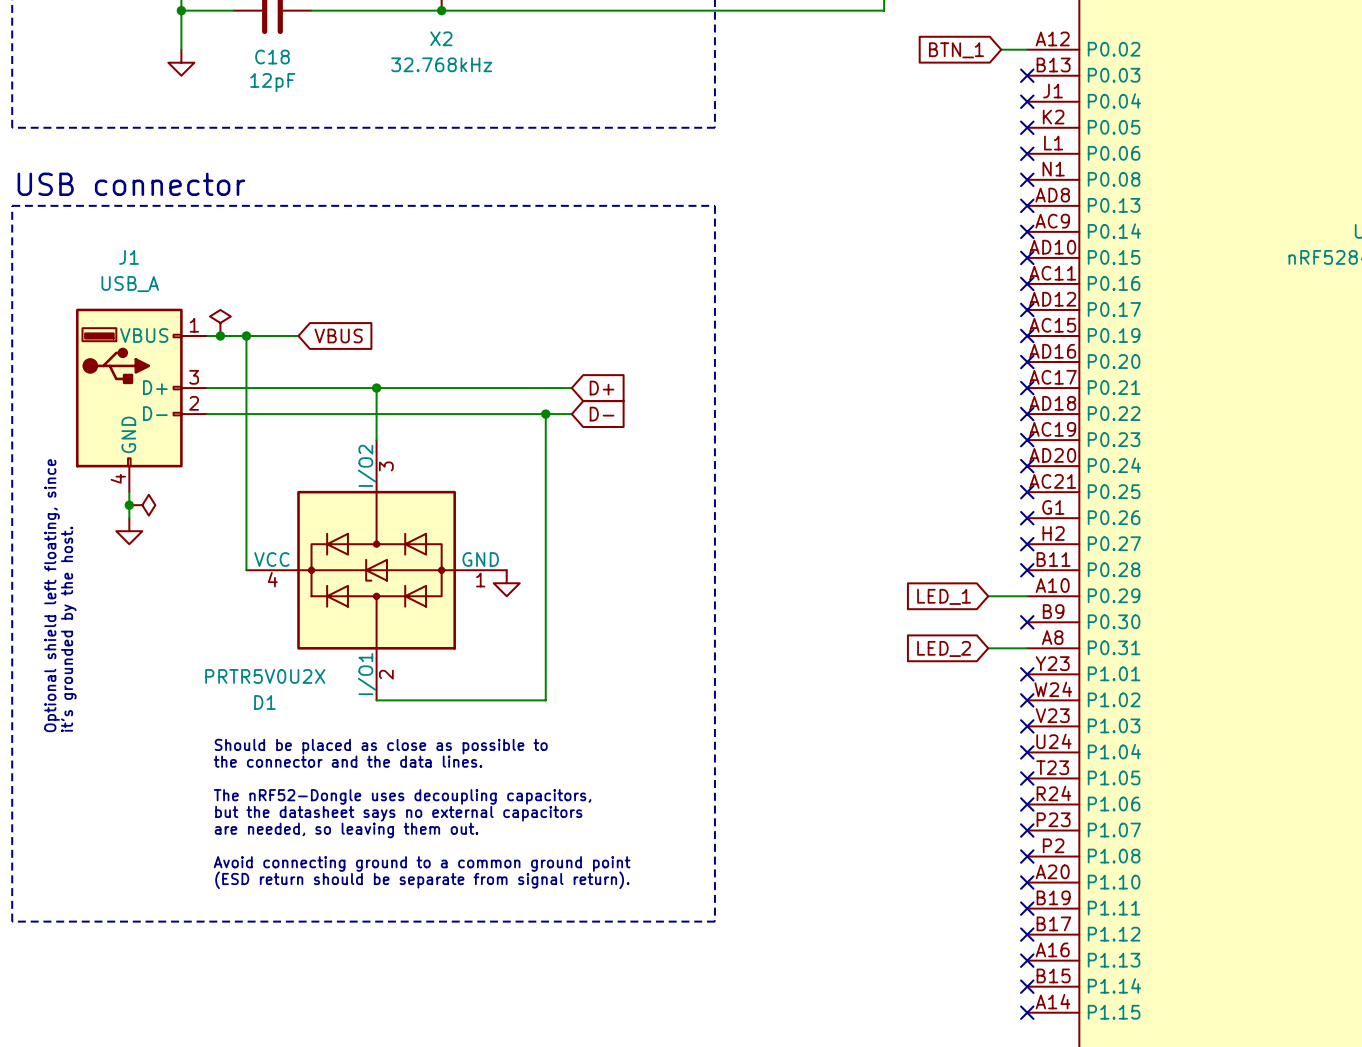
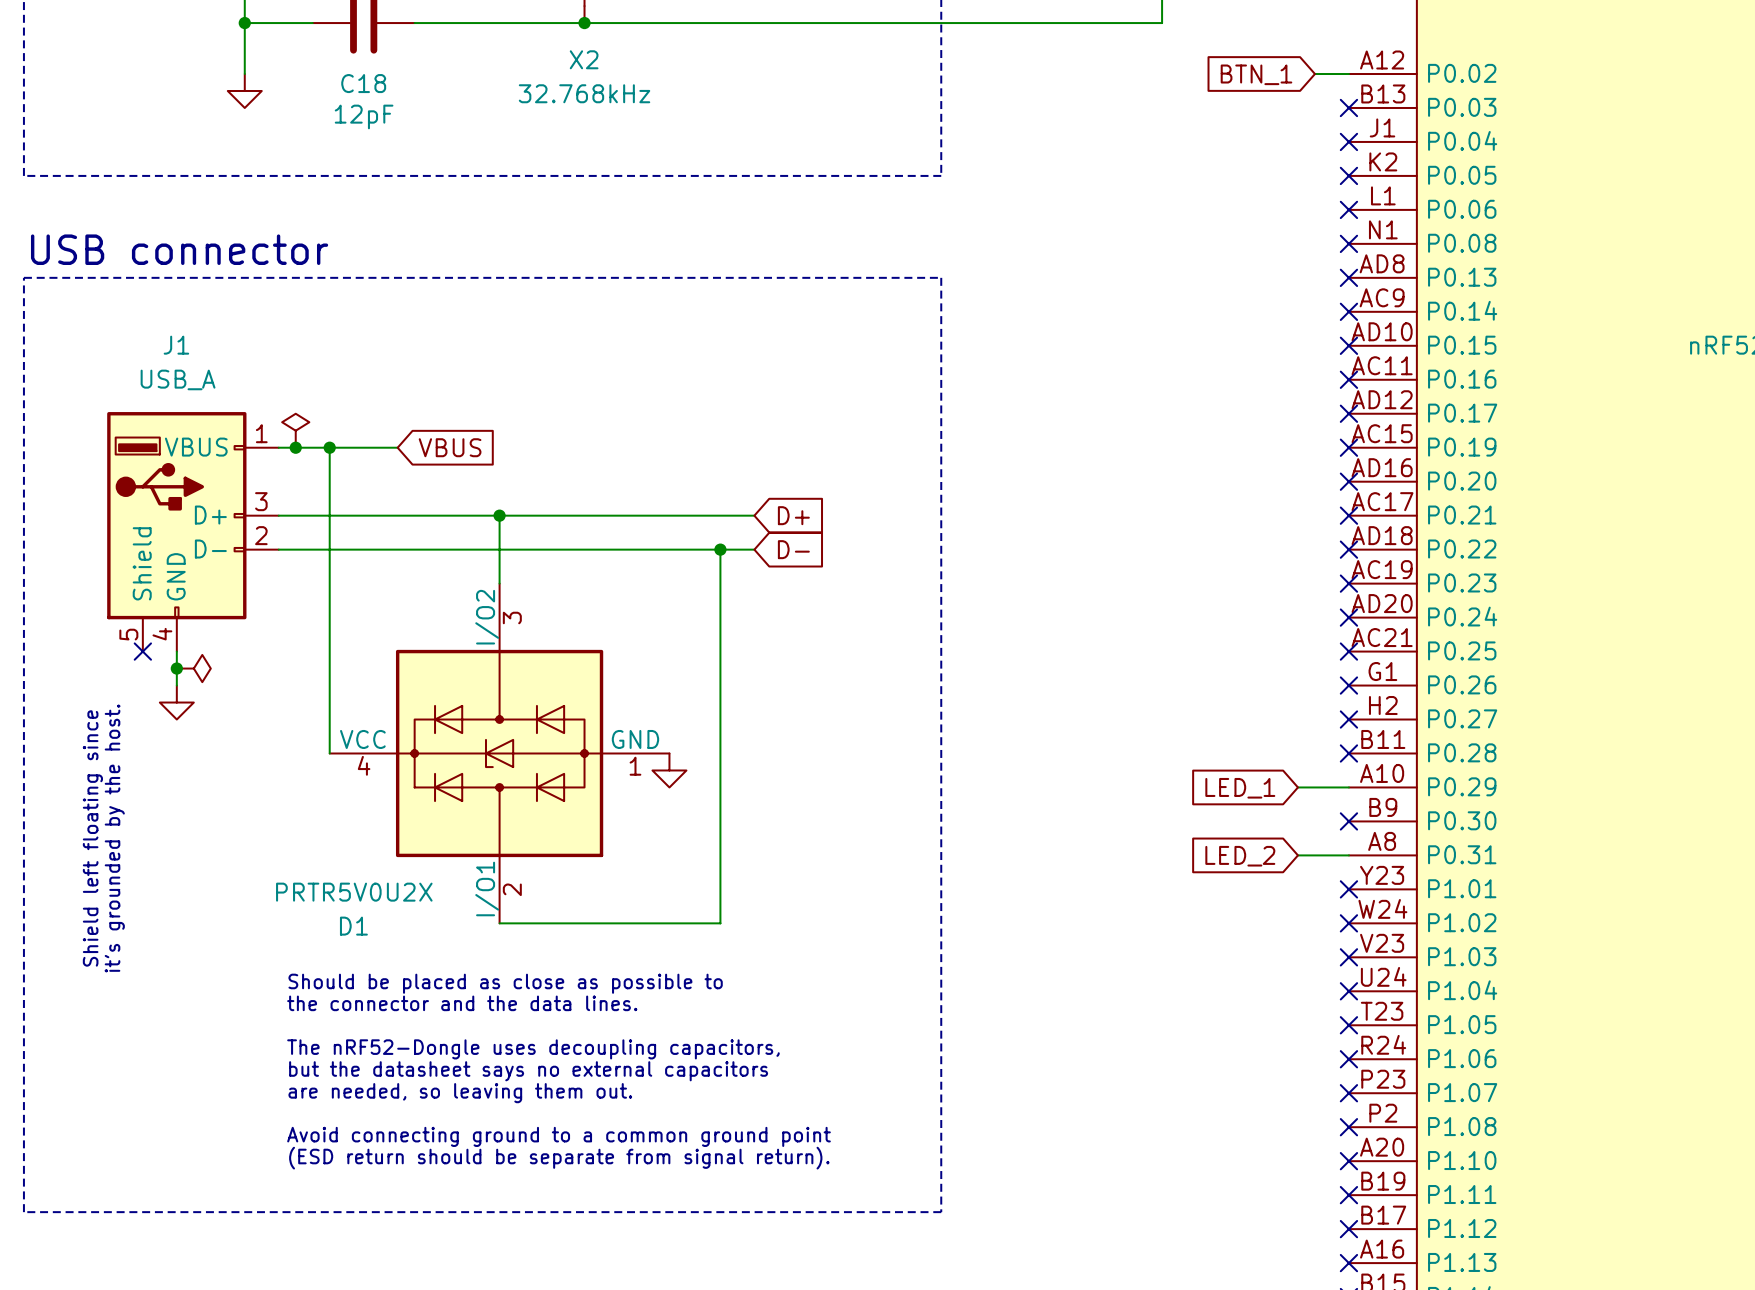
J1 symbol: [75, 308, 208, 493] -> [107, 412, 279, 652]
no-connect mark: none -> (142, 651)
text: Optional shield left floating, since (52, 595) -> Shield left floating since (92, 838)
text position: it's grounded by the host. (68, 629) -> it's grounded by the host. (114, 838)

